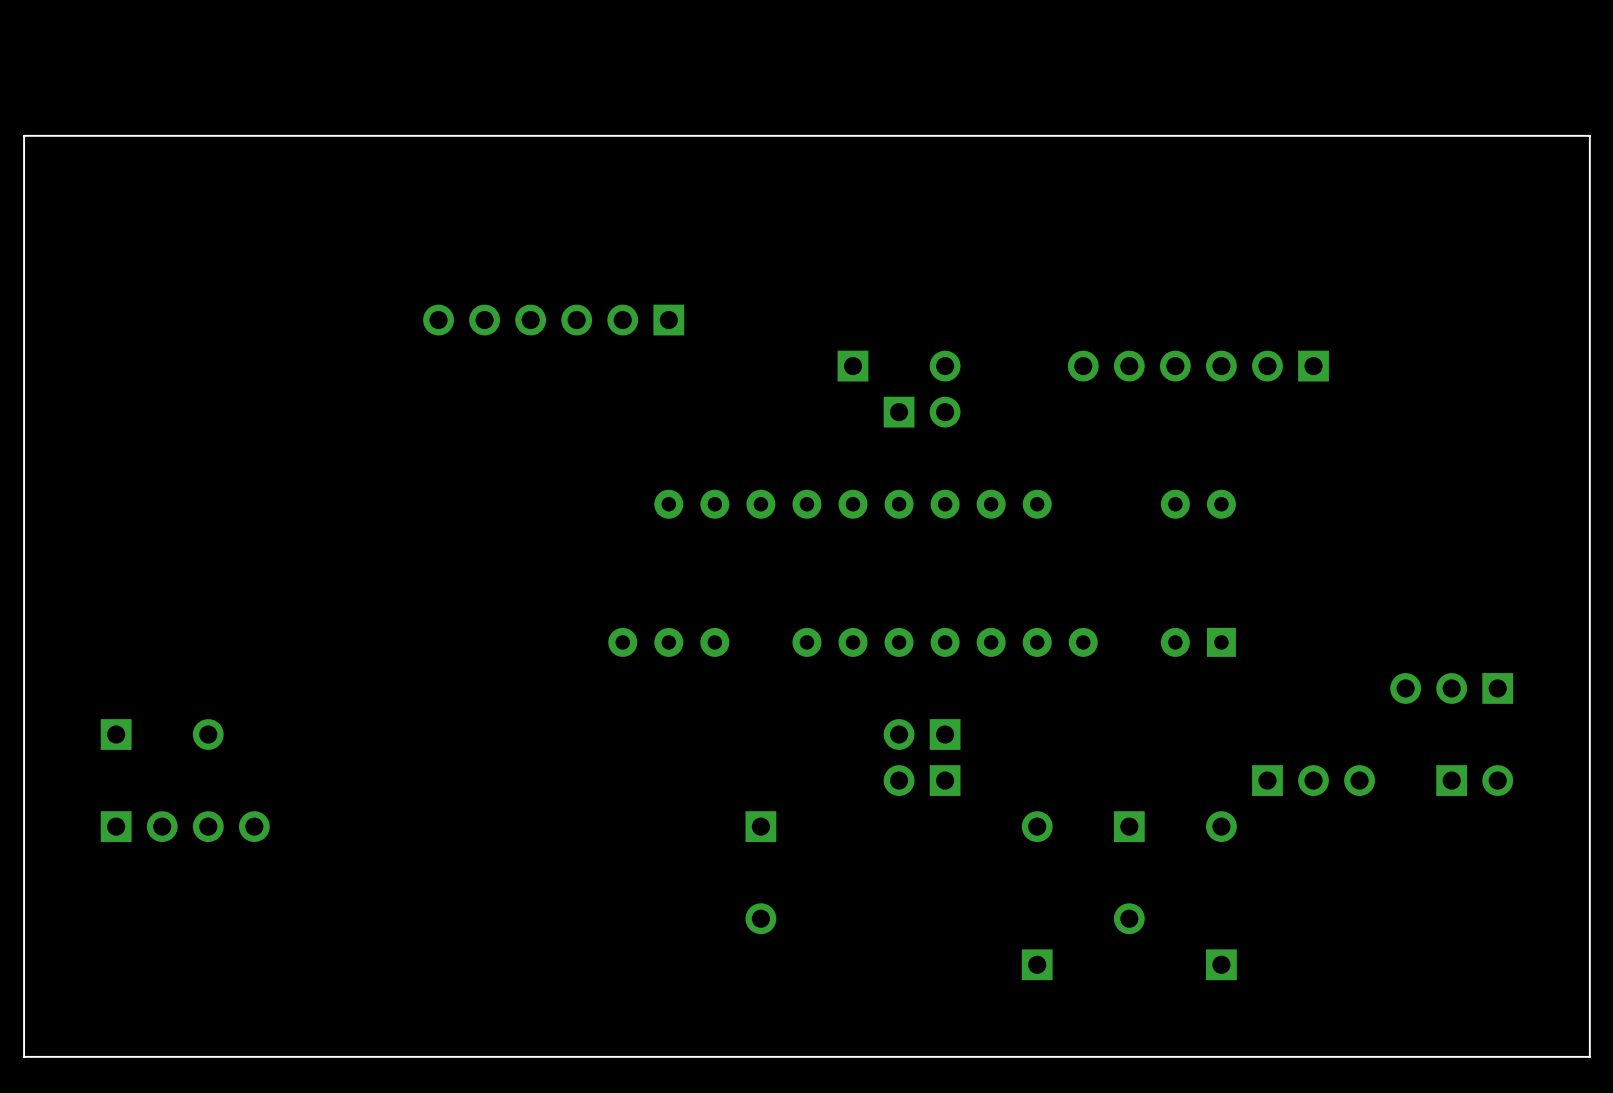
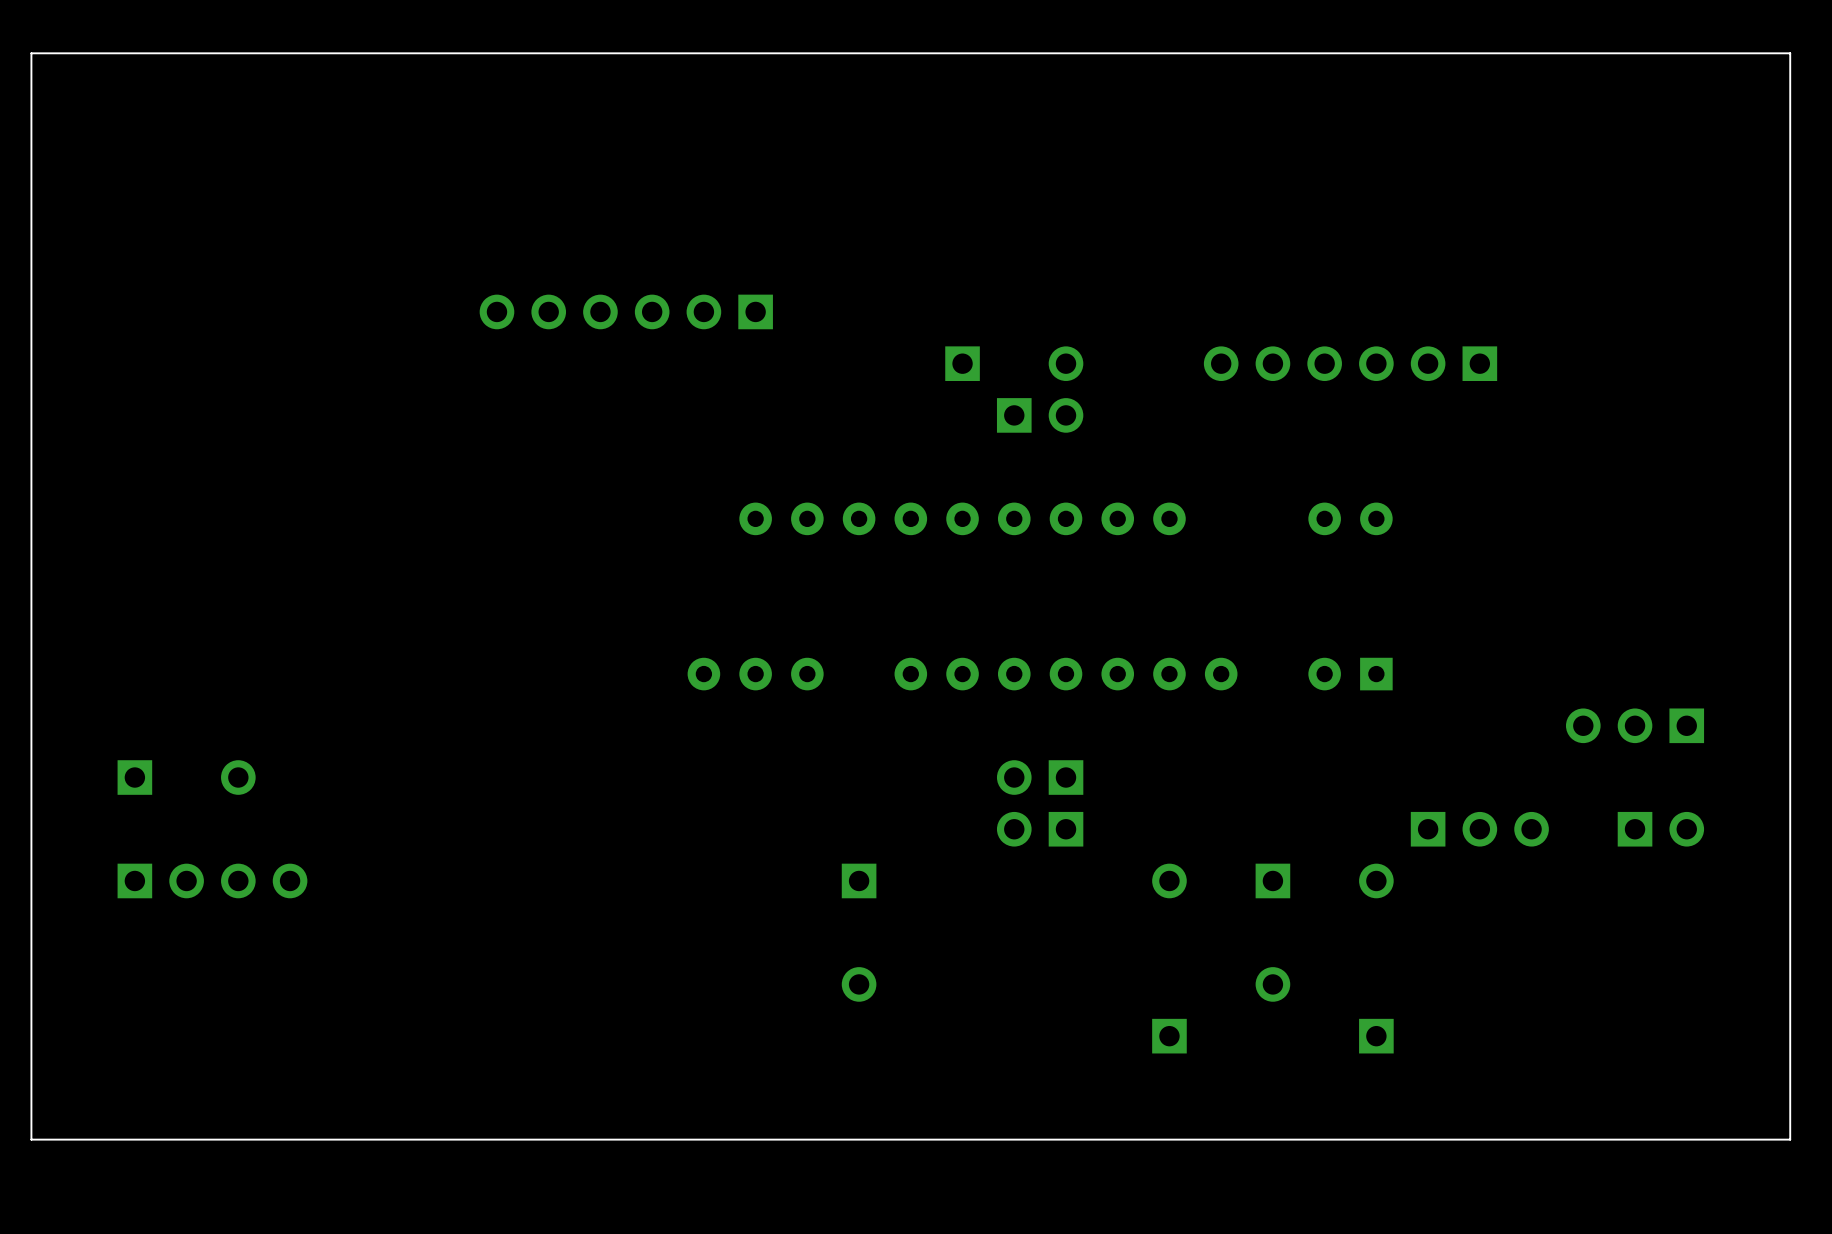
board edge: (1589, 135) (24, 135) -> (1790, 105) (1790, 53) (31, 53) (31, 105)

